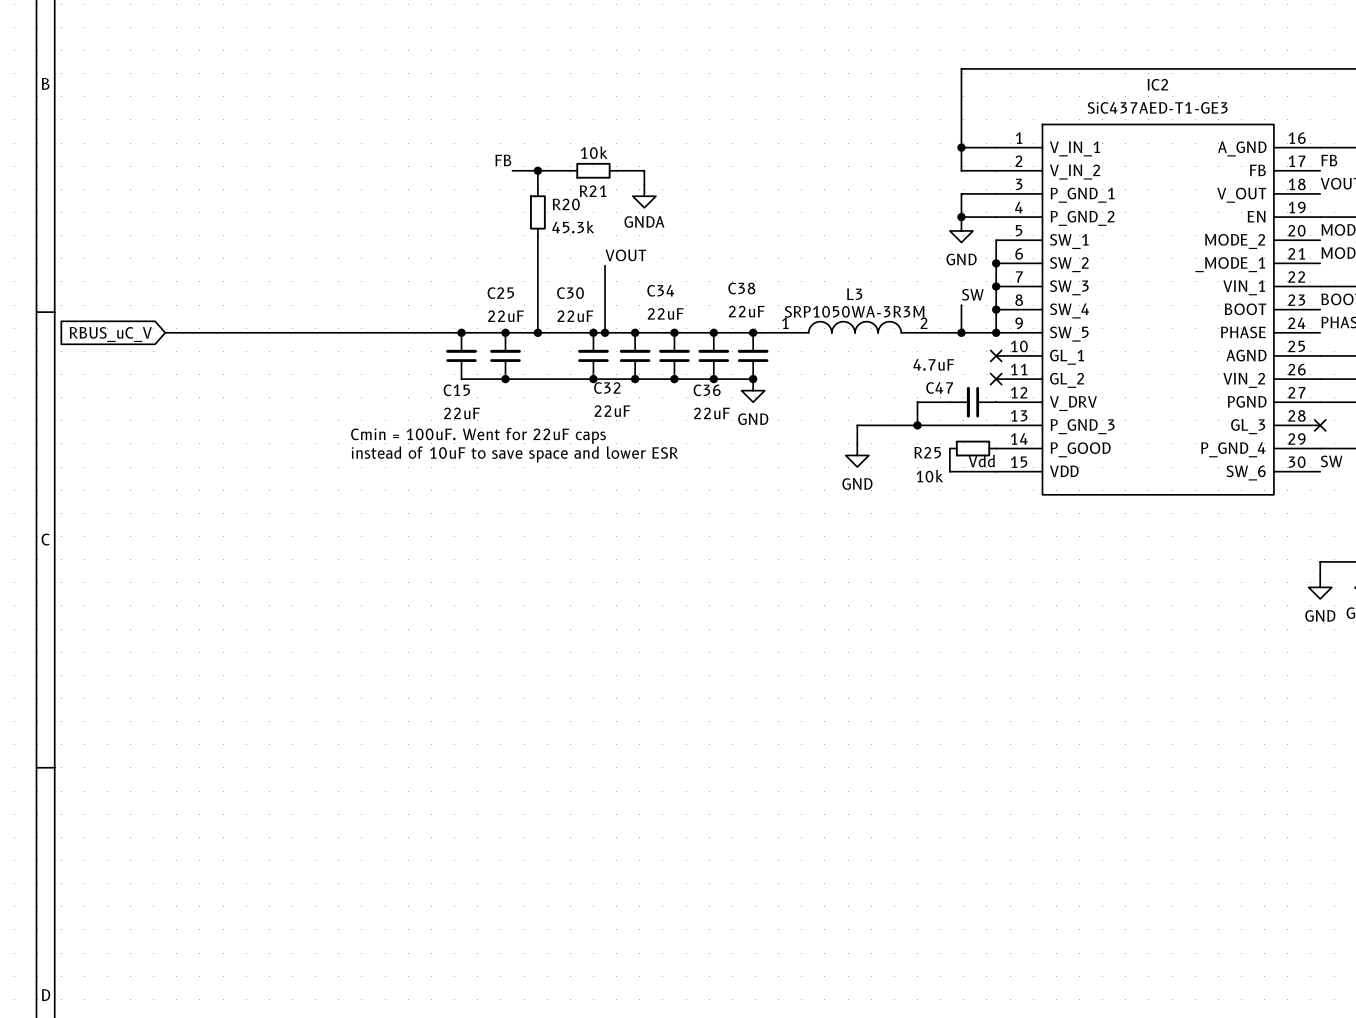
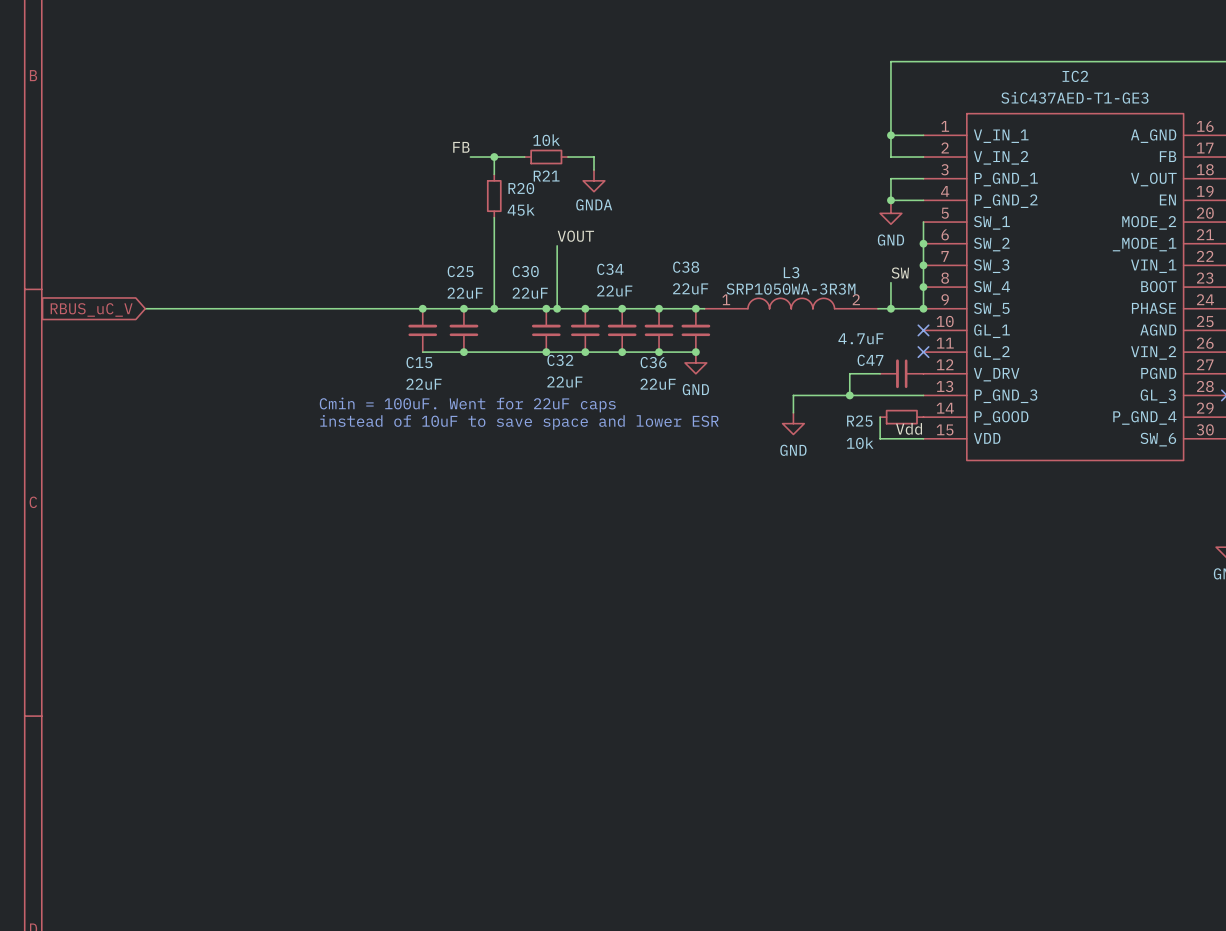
R20 value: 45.3k (573, 227) -> 45k (521, 209)

